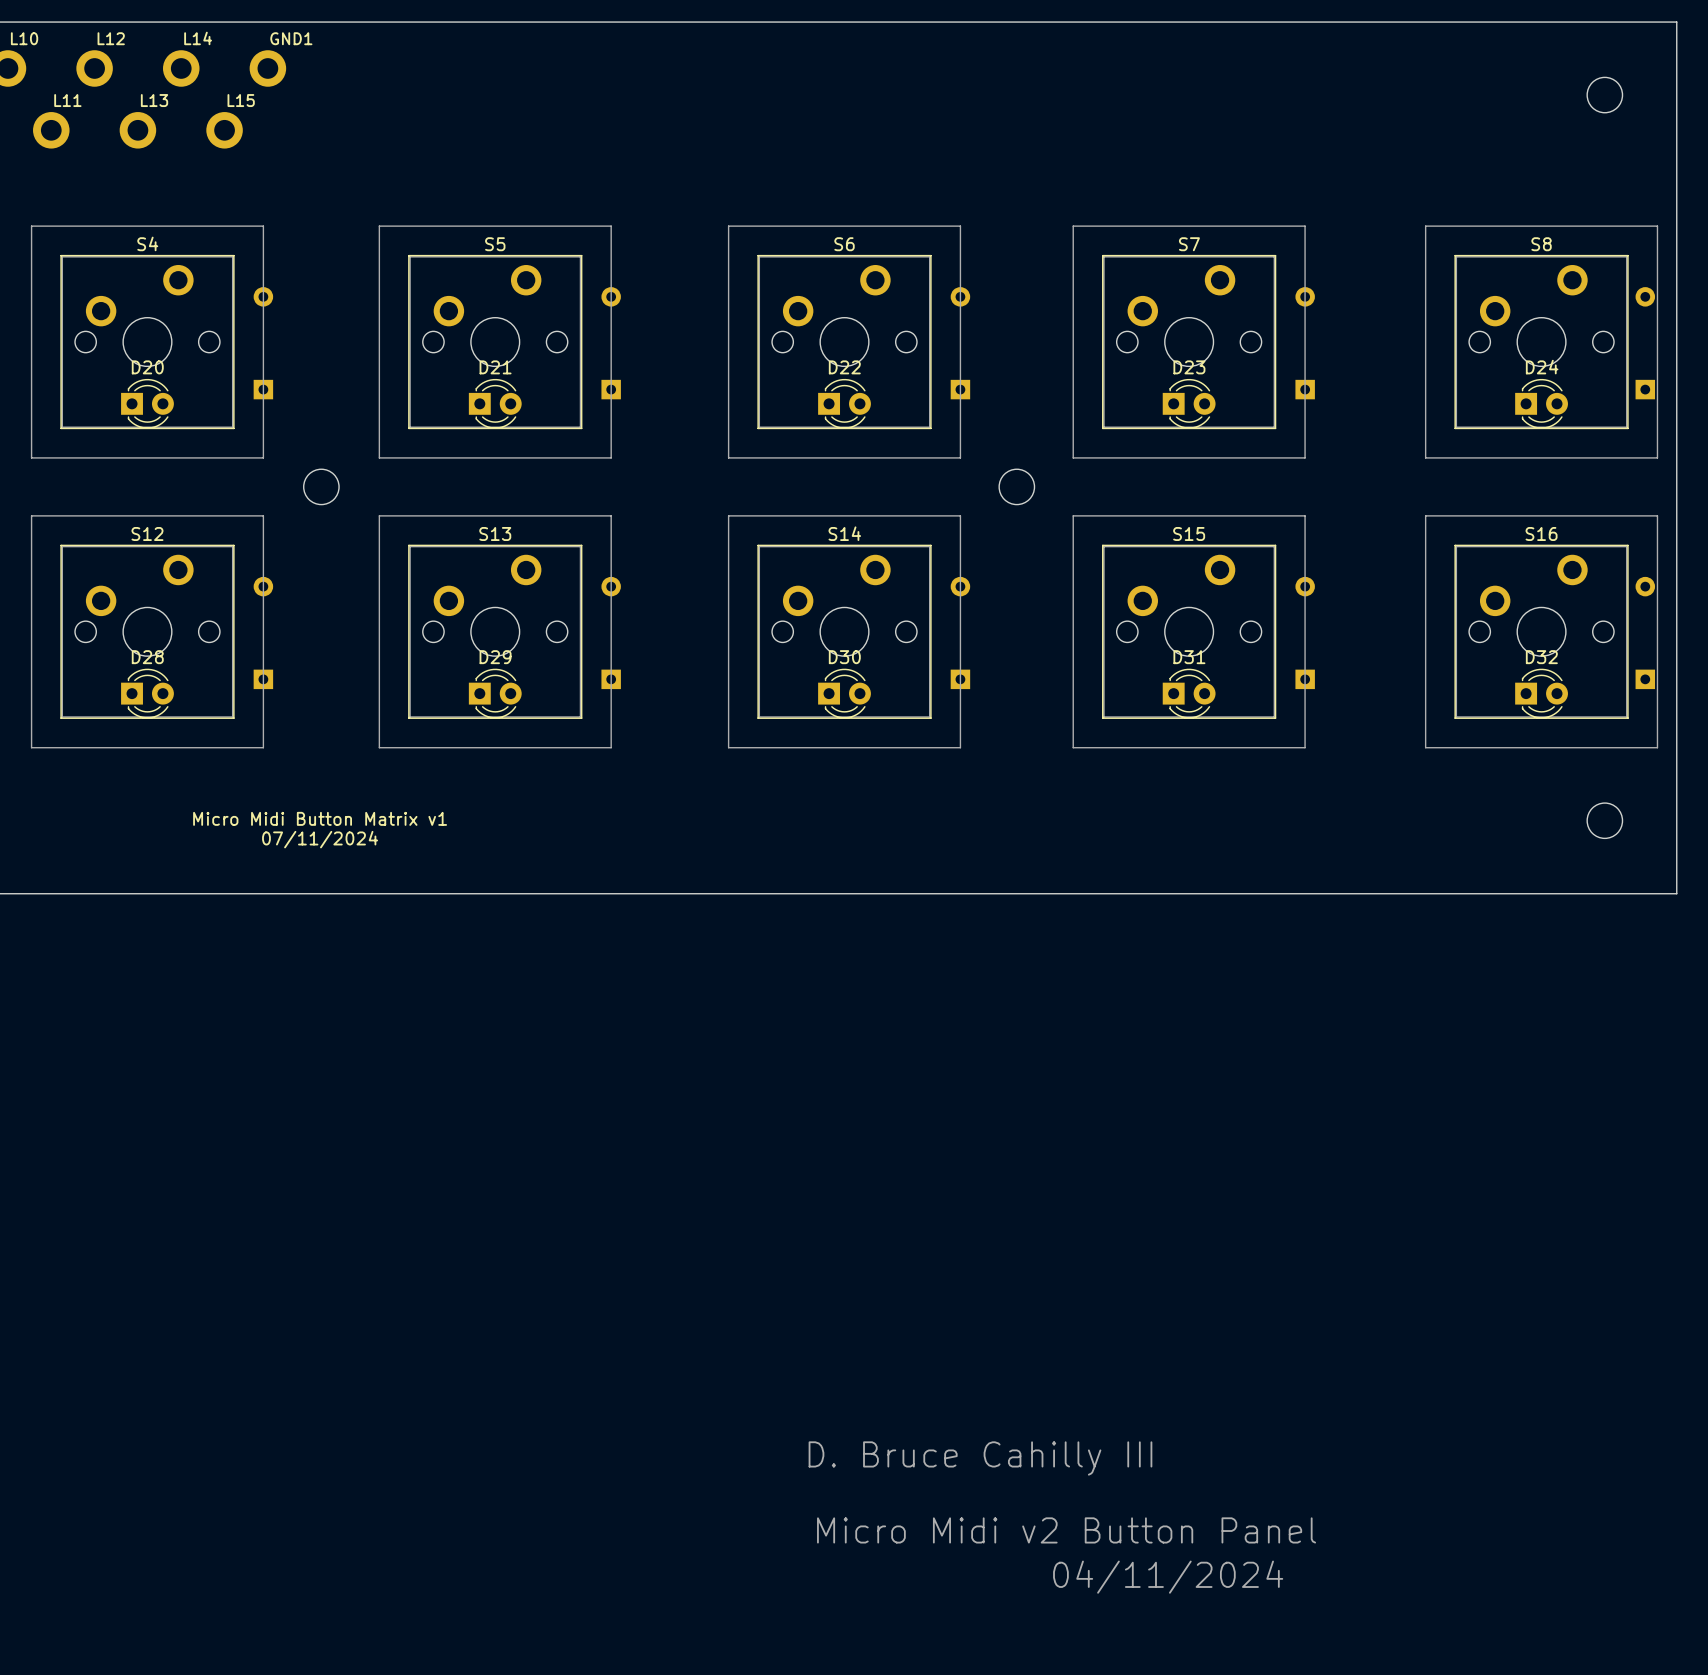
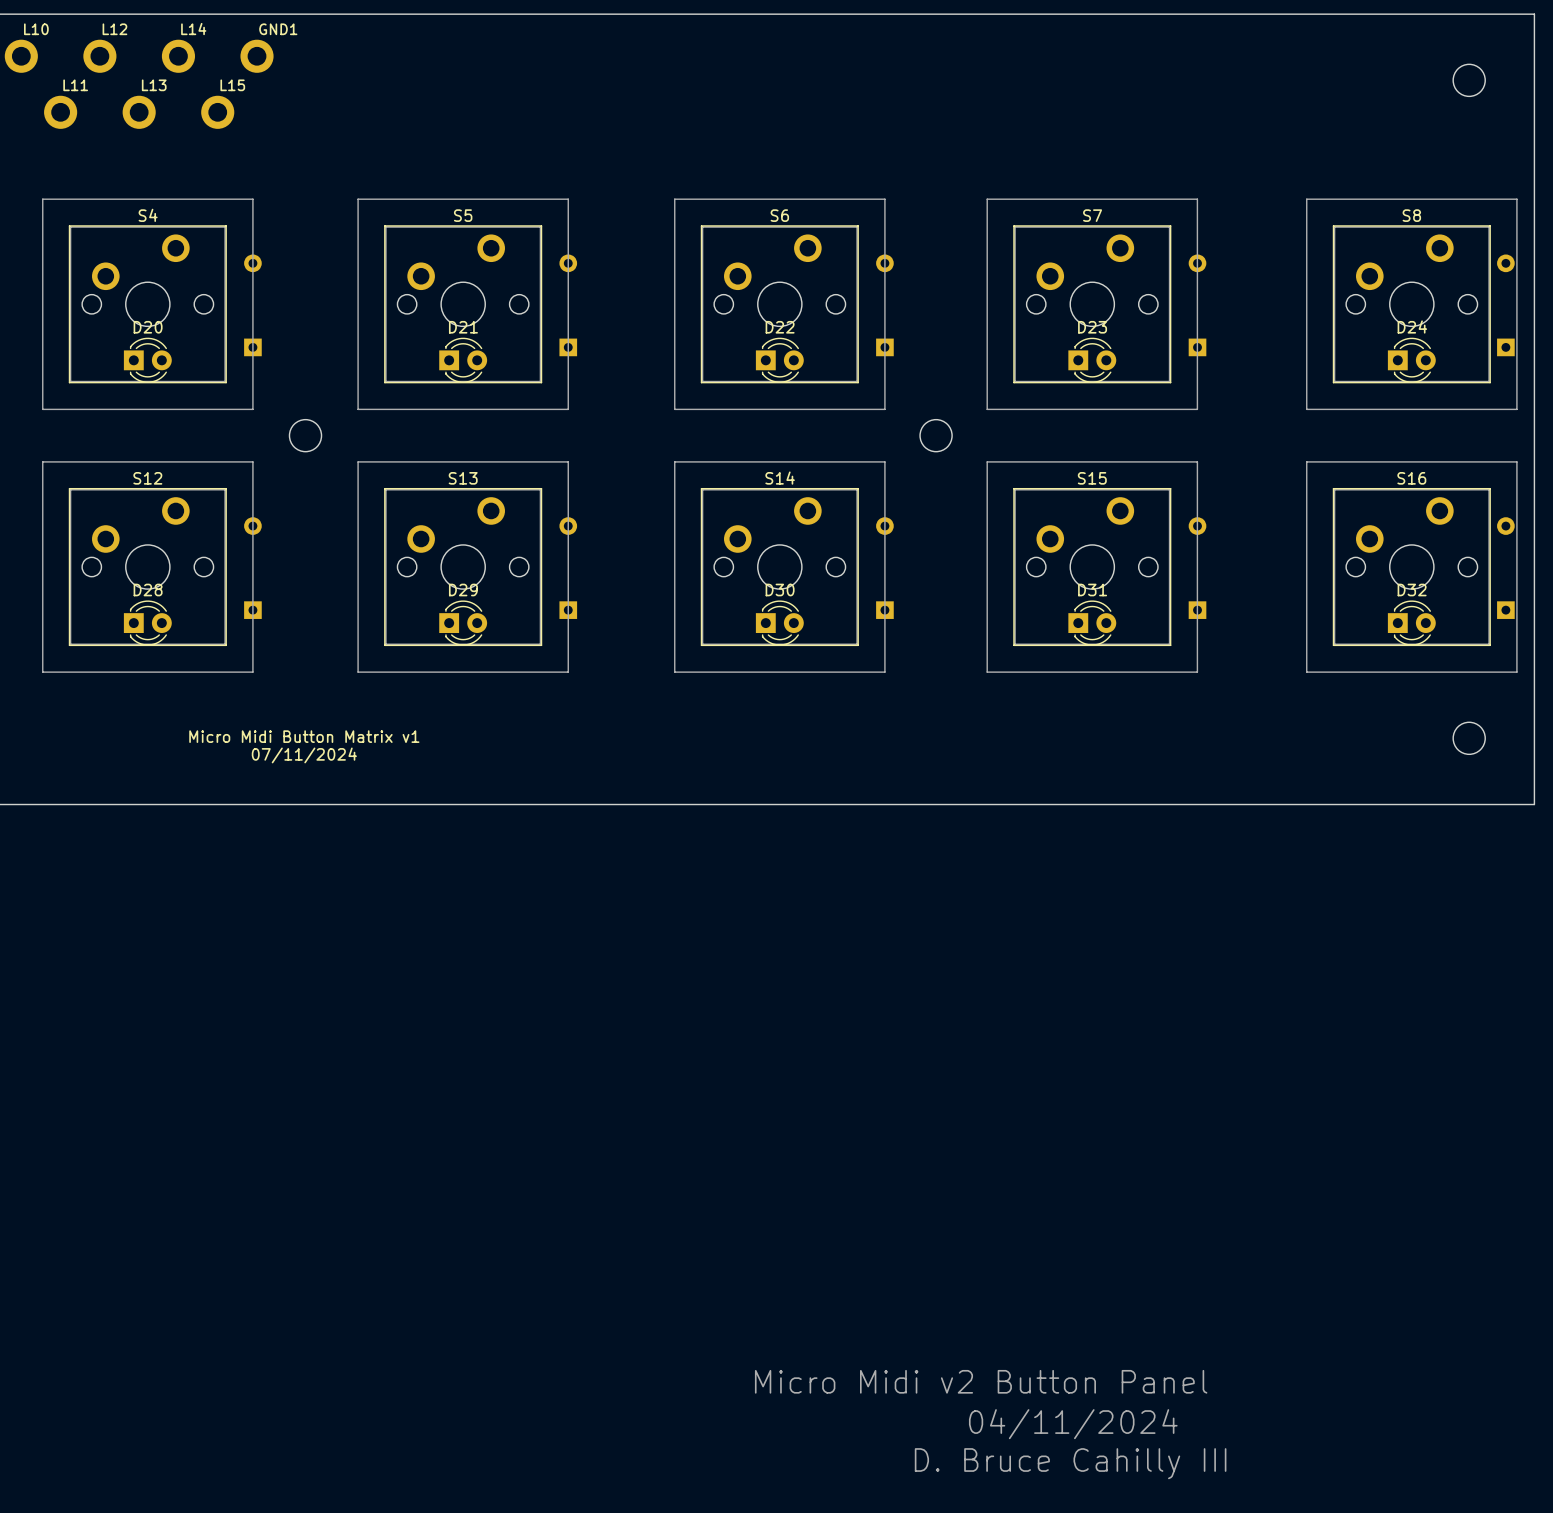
text position: D. Bruce Cahilly III (980, 1458) -> D. Bruce Cahilly III (1070, 1463)

